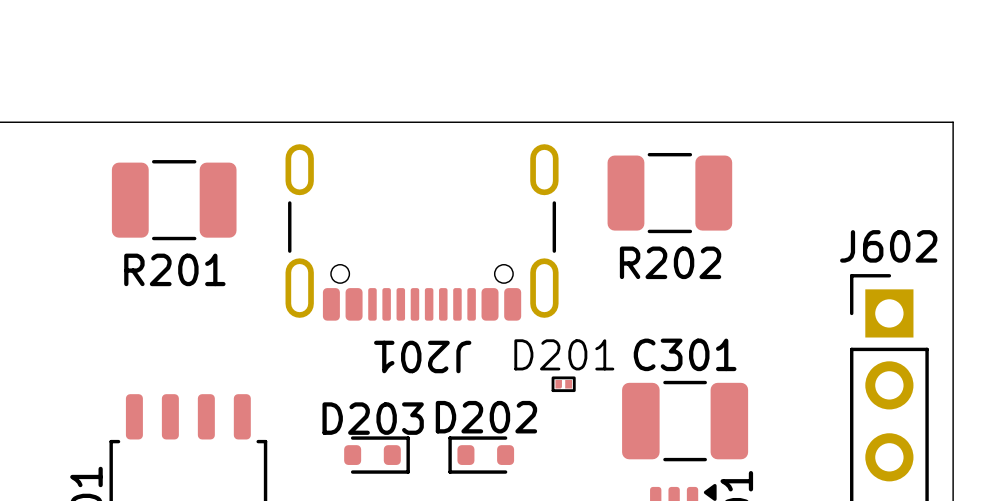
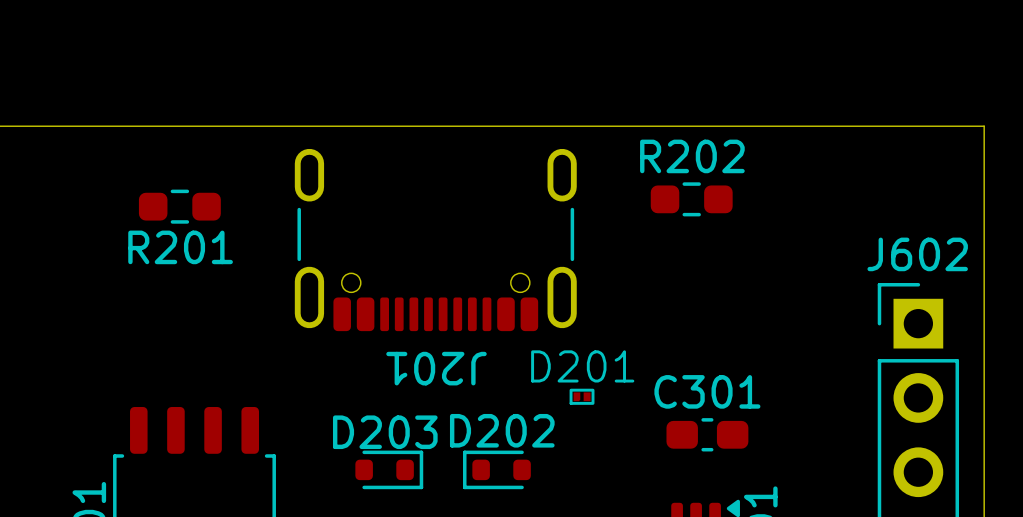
R202 footprint: [607, 152, 733, 234] -> [650, 182, 733, 217]
R201 footprint: [111, 160, 237, 241] -> [138, 189, 221, 224]
R202 name position: R202 (670, 262) -> R202 (692, 156)
C301 footprint: [622, 380, 749, 462] -> [666, 418, 749, 452]

